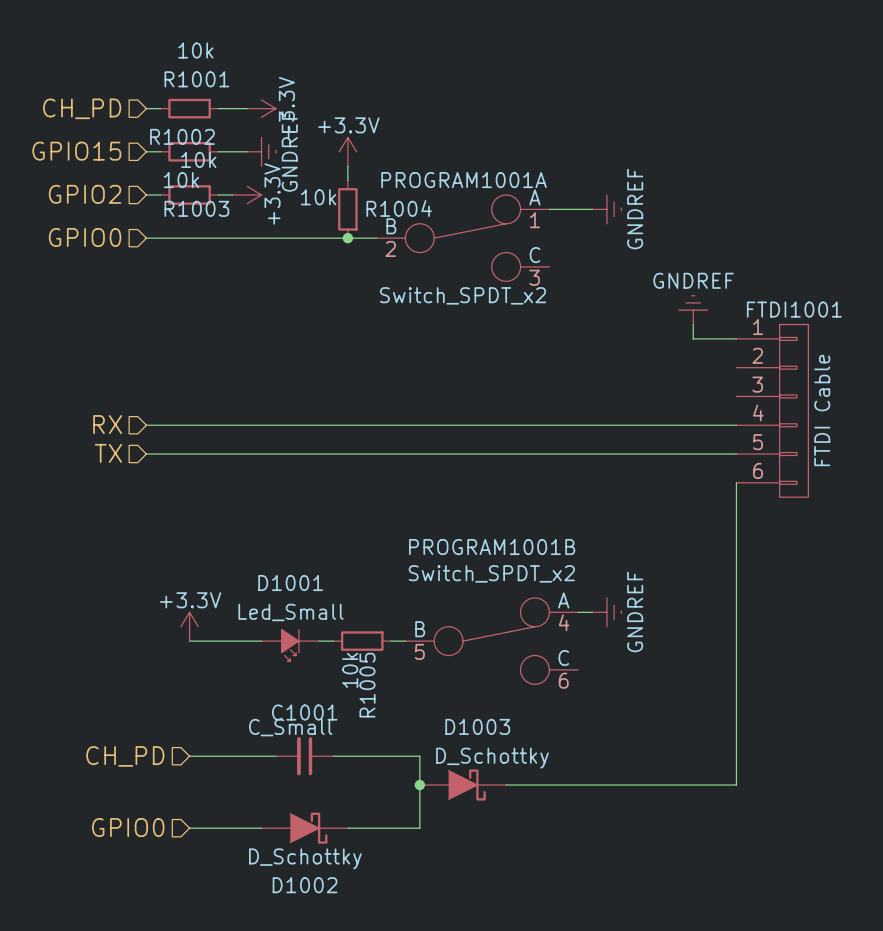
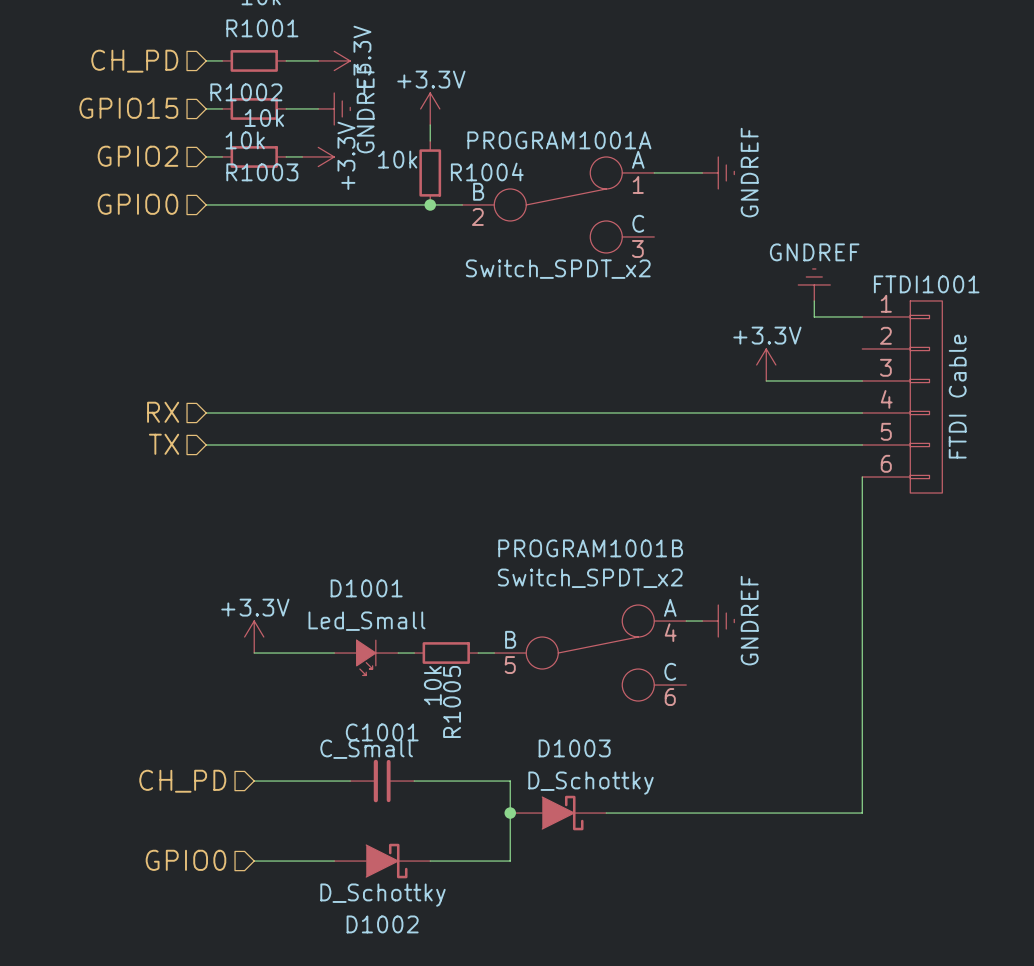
power symbol: none -> +3.3V (766, 364)
wire: none -> (766, 380) (862, 380)

